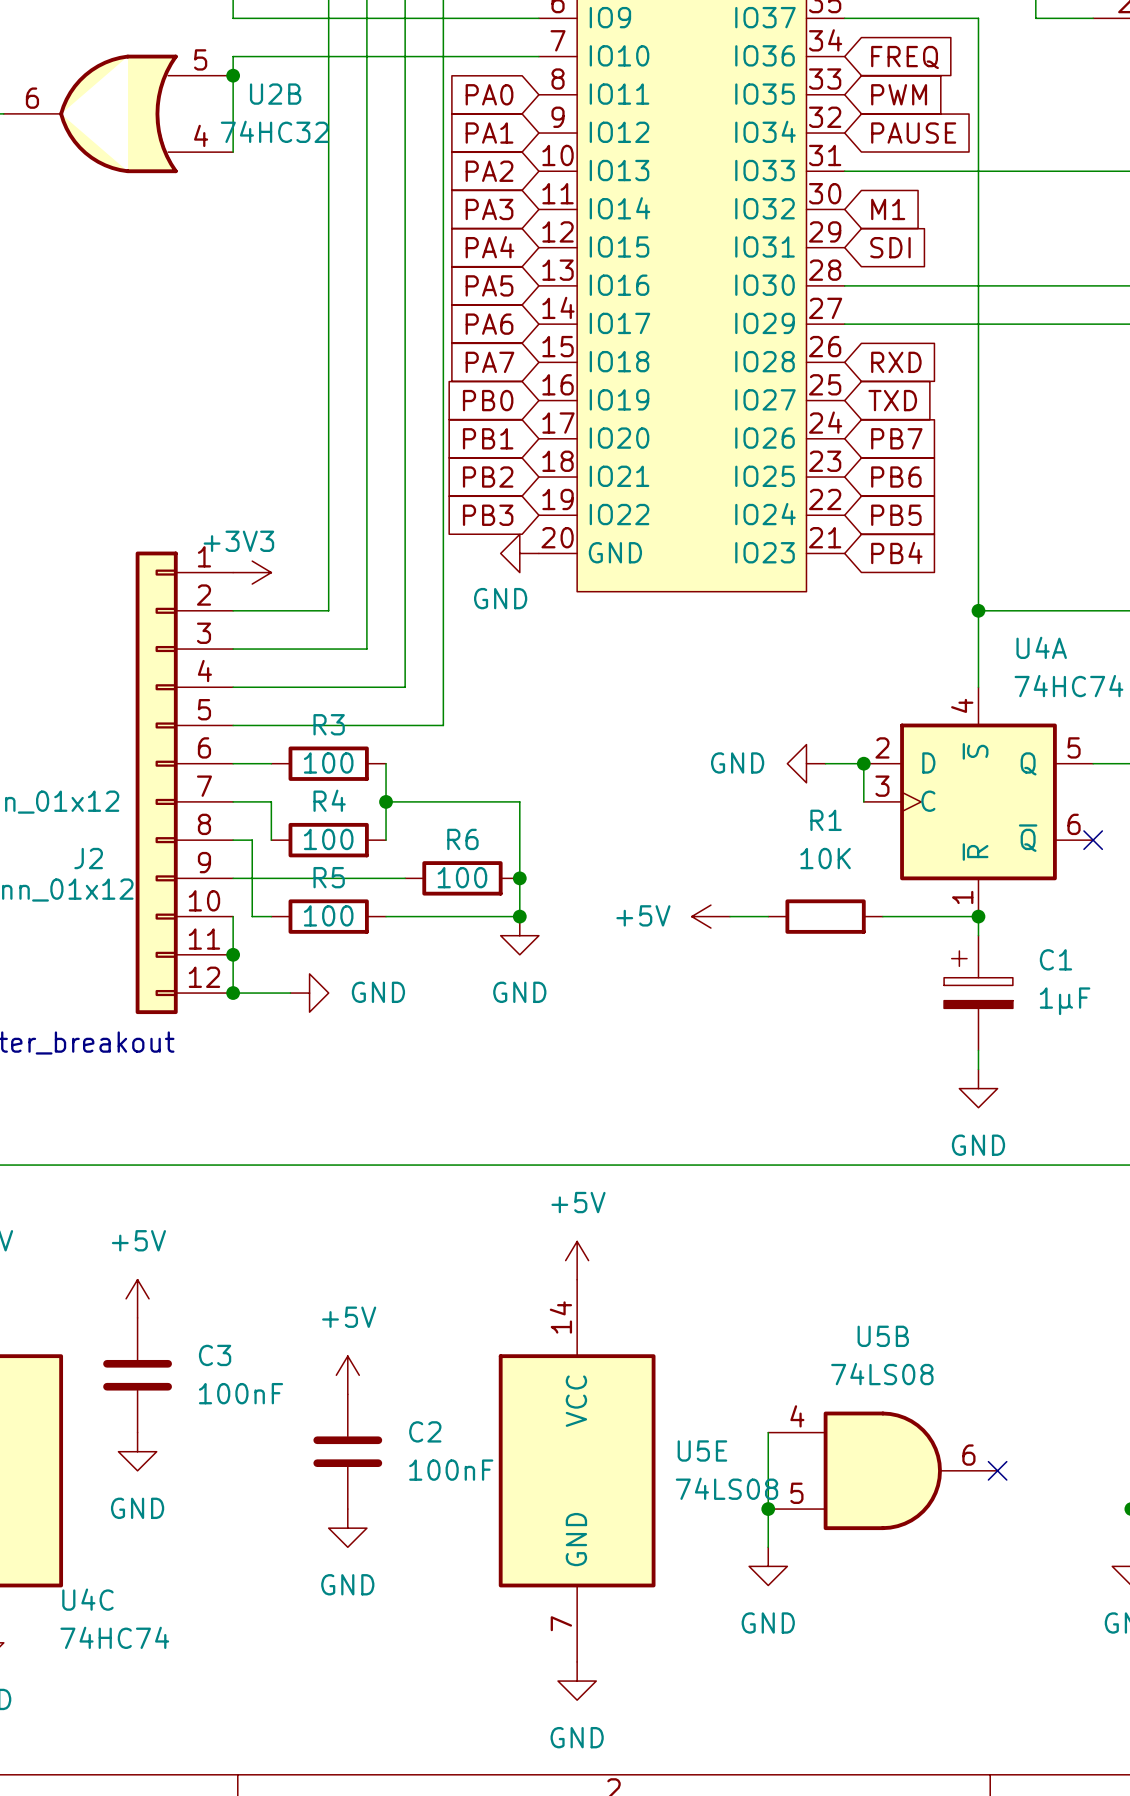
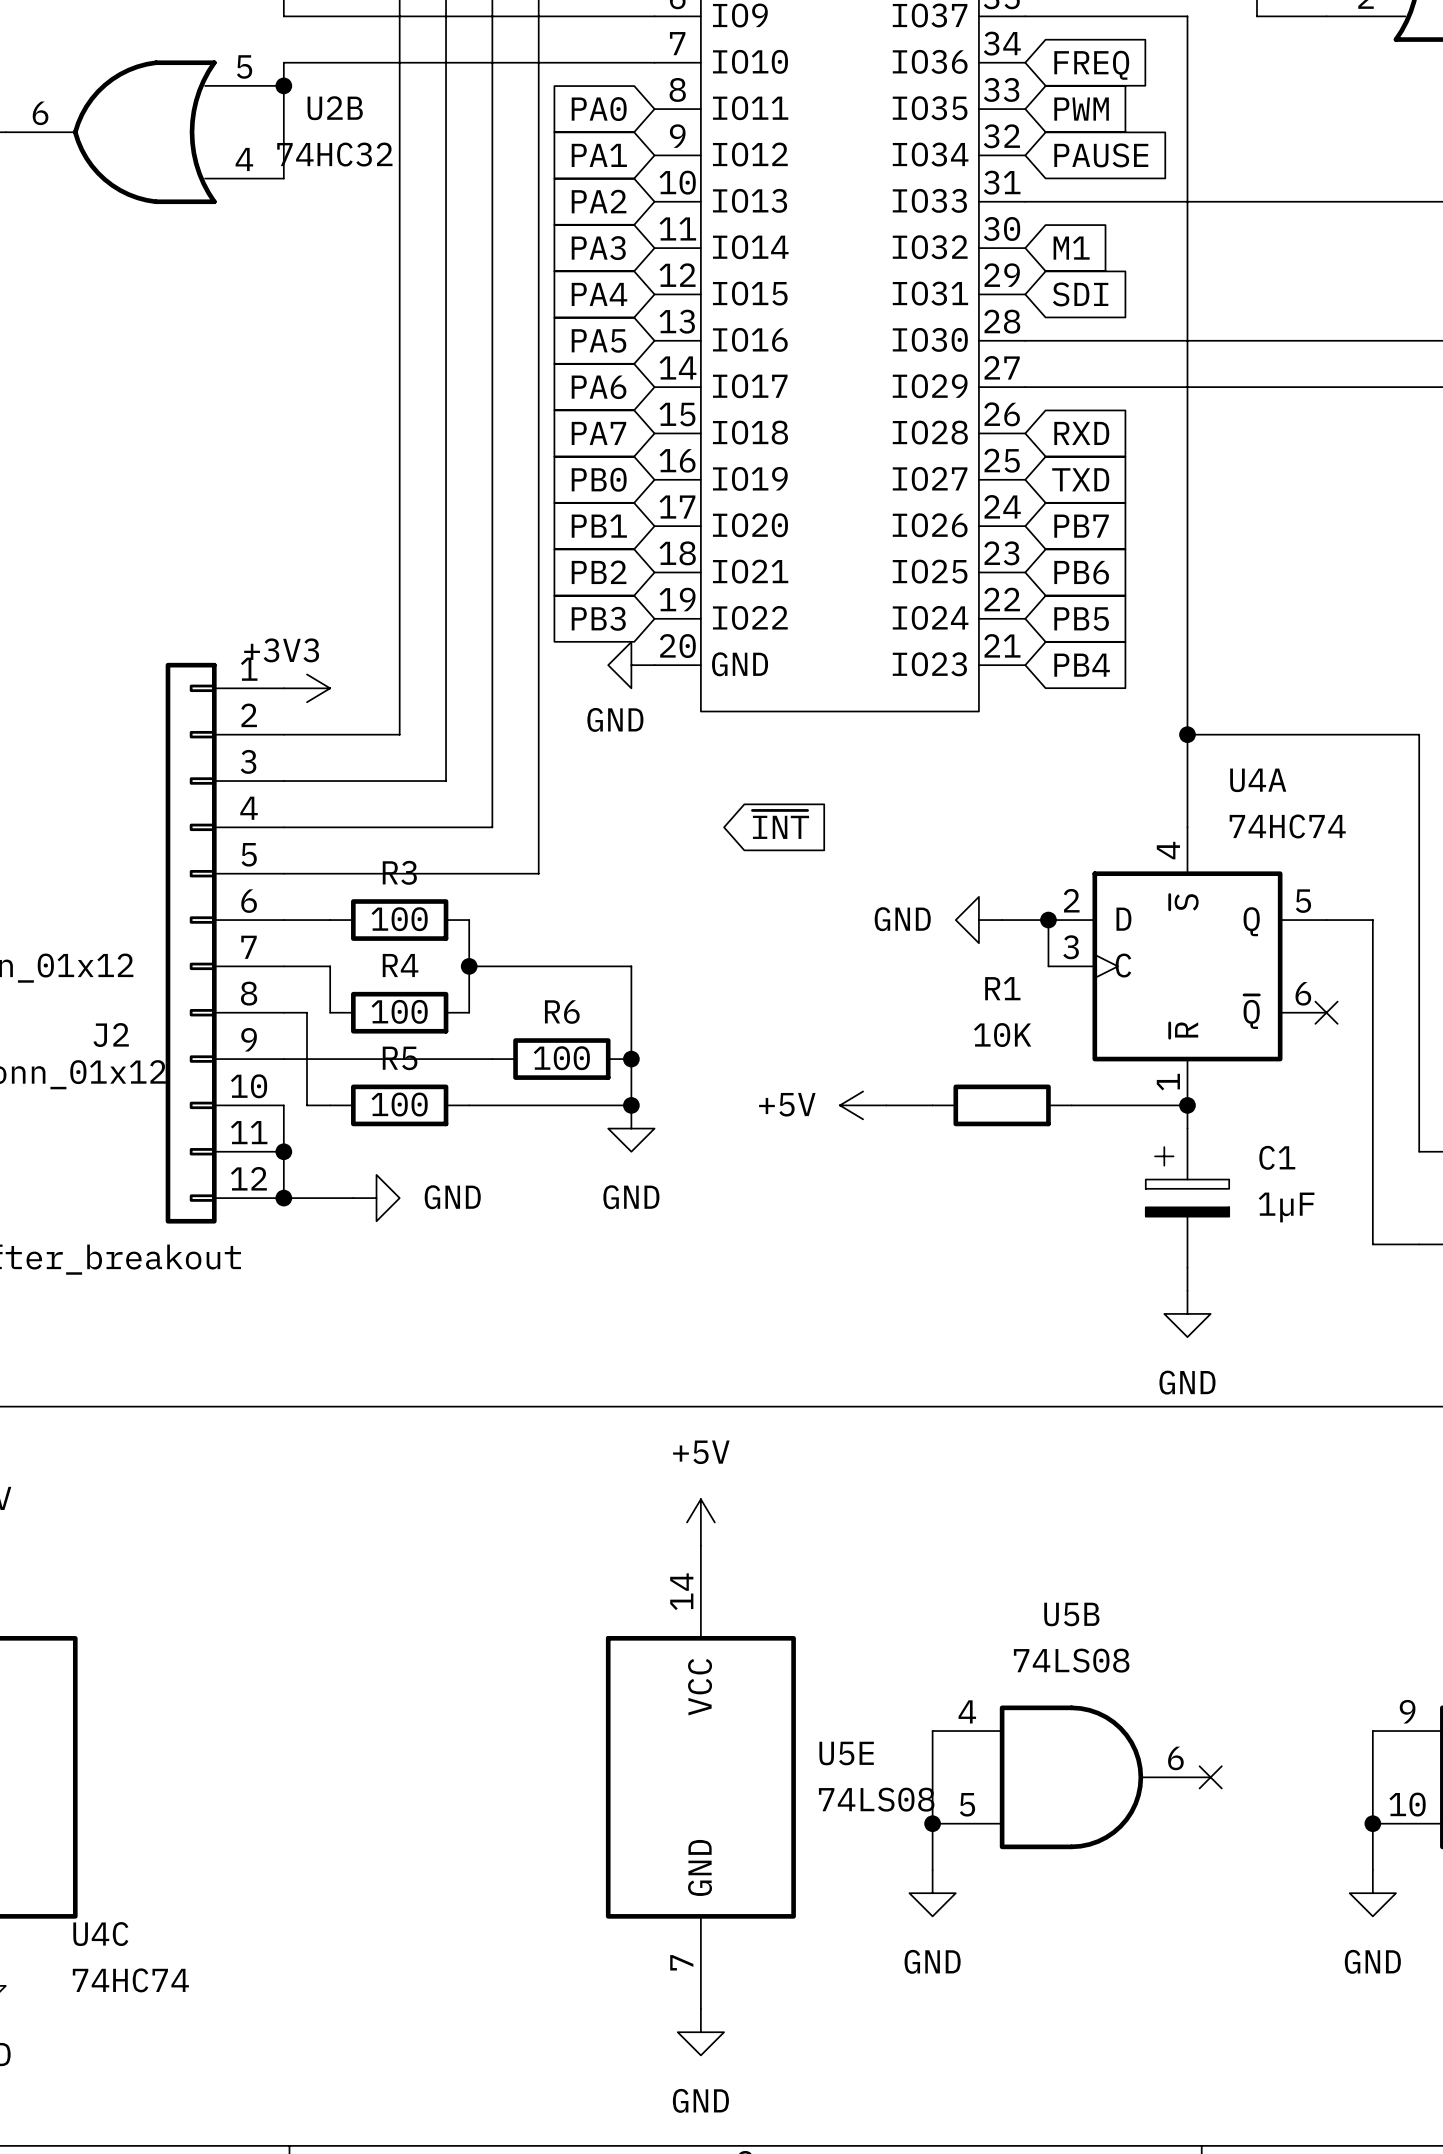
global label: none -> ~{INT} (780, 824)
power symbol: +5V (137, 1298) -> none
C3: 100nF (137, 1375) -> none
power symbol: +5V (347, 1375) -> none
power symbol: GND (137, 1451) -> none
C2: 100nF (347, 1451) -> none
power symbol: GND (347, 1528) -> none

